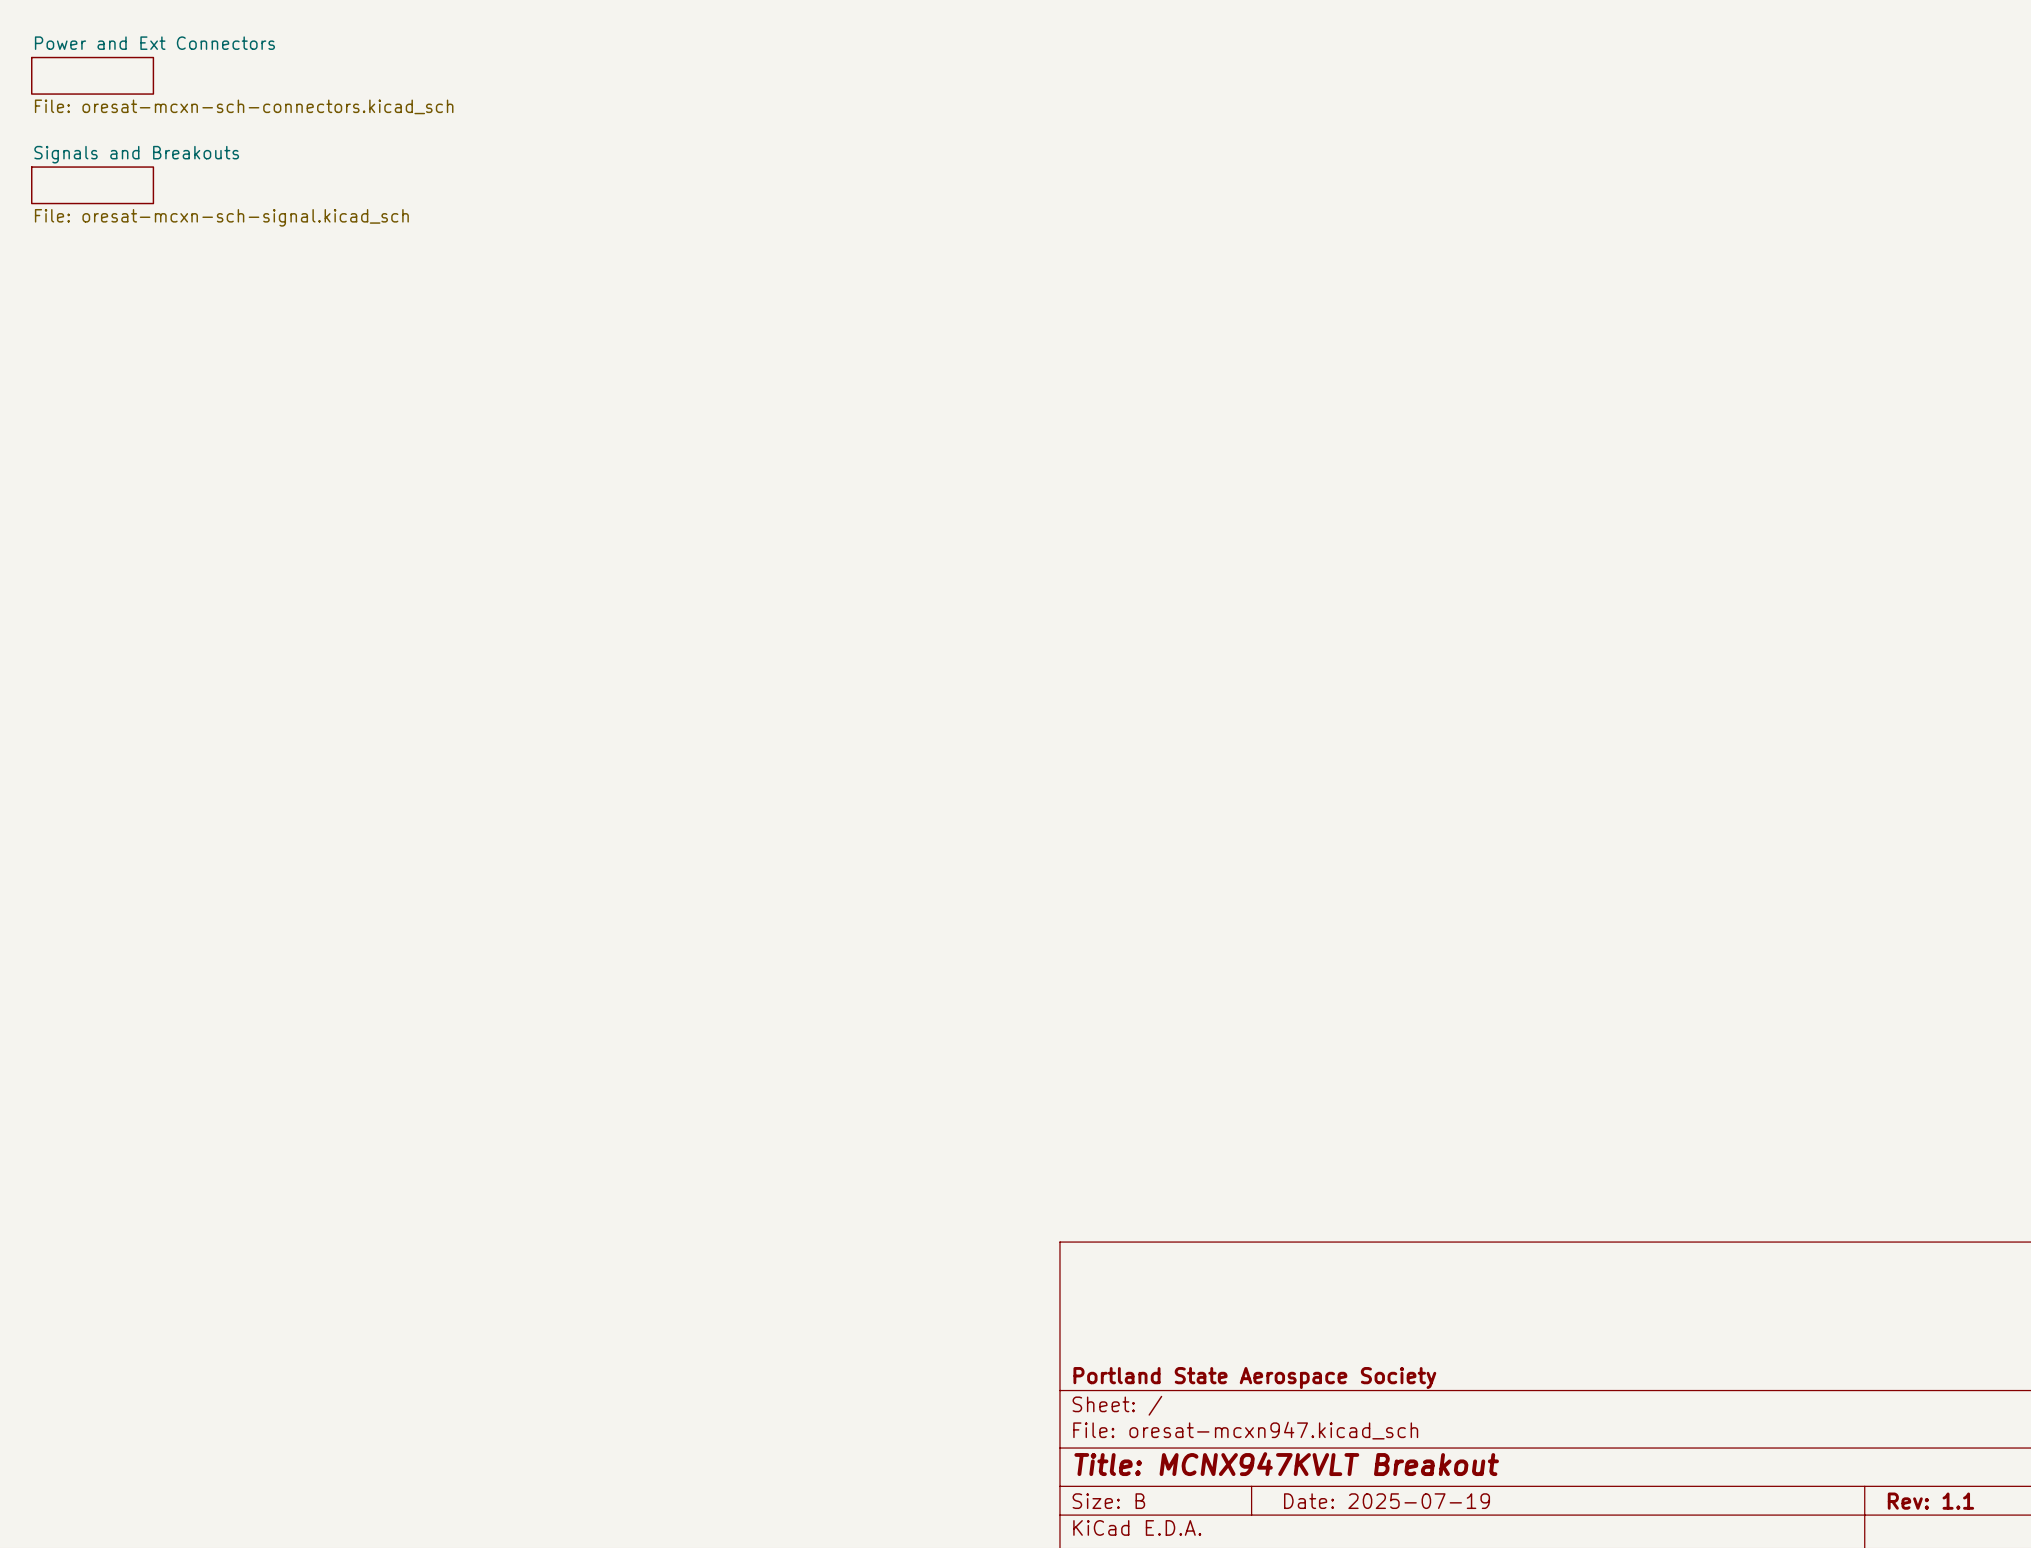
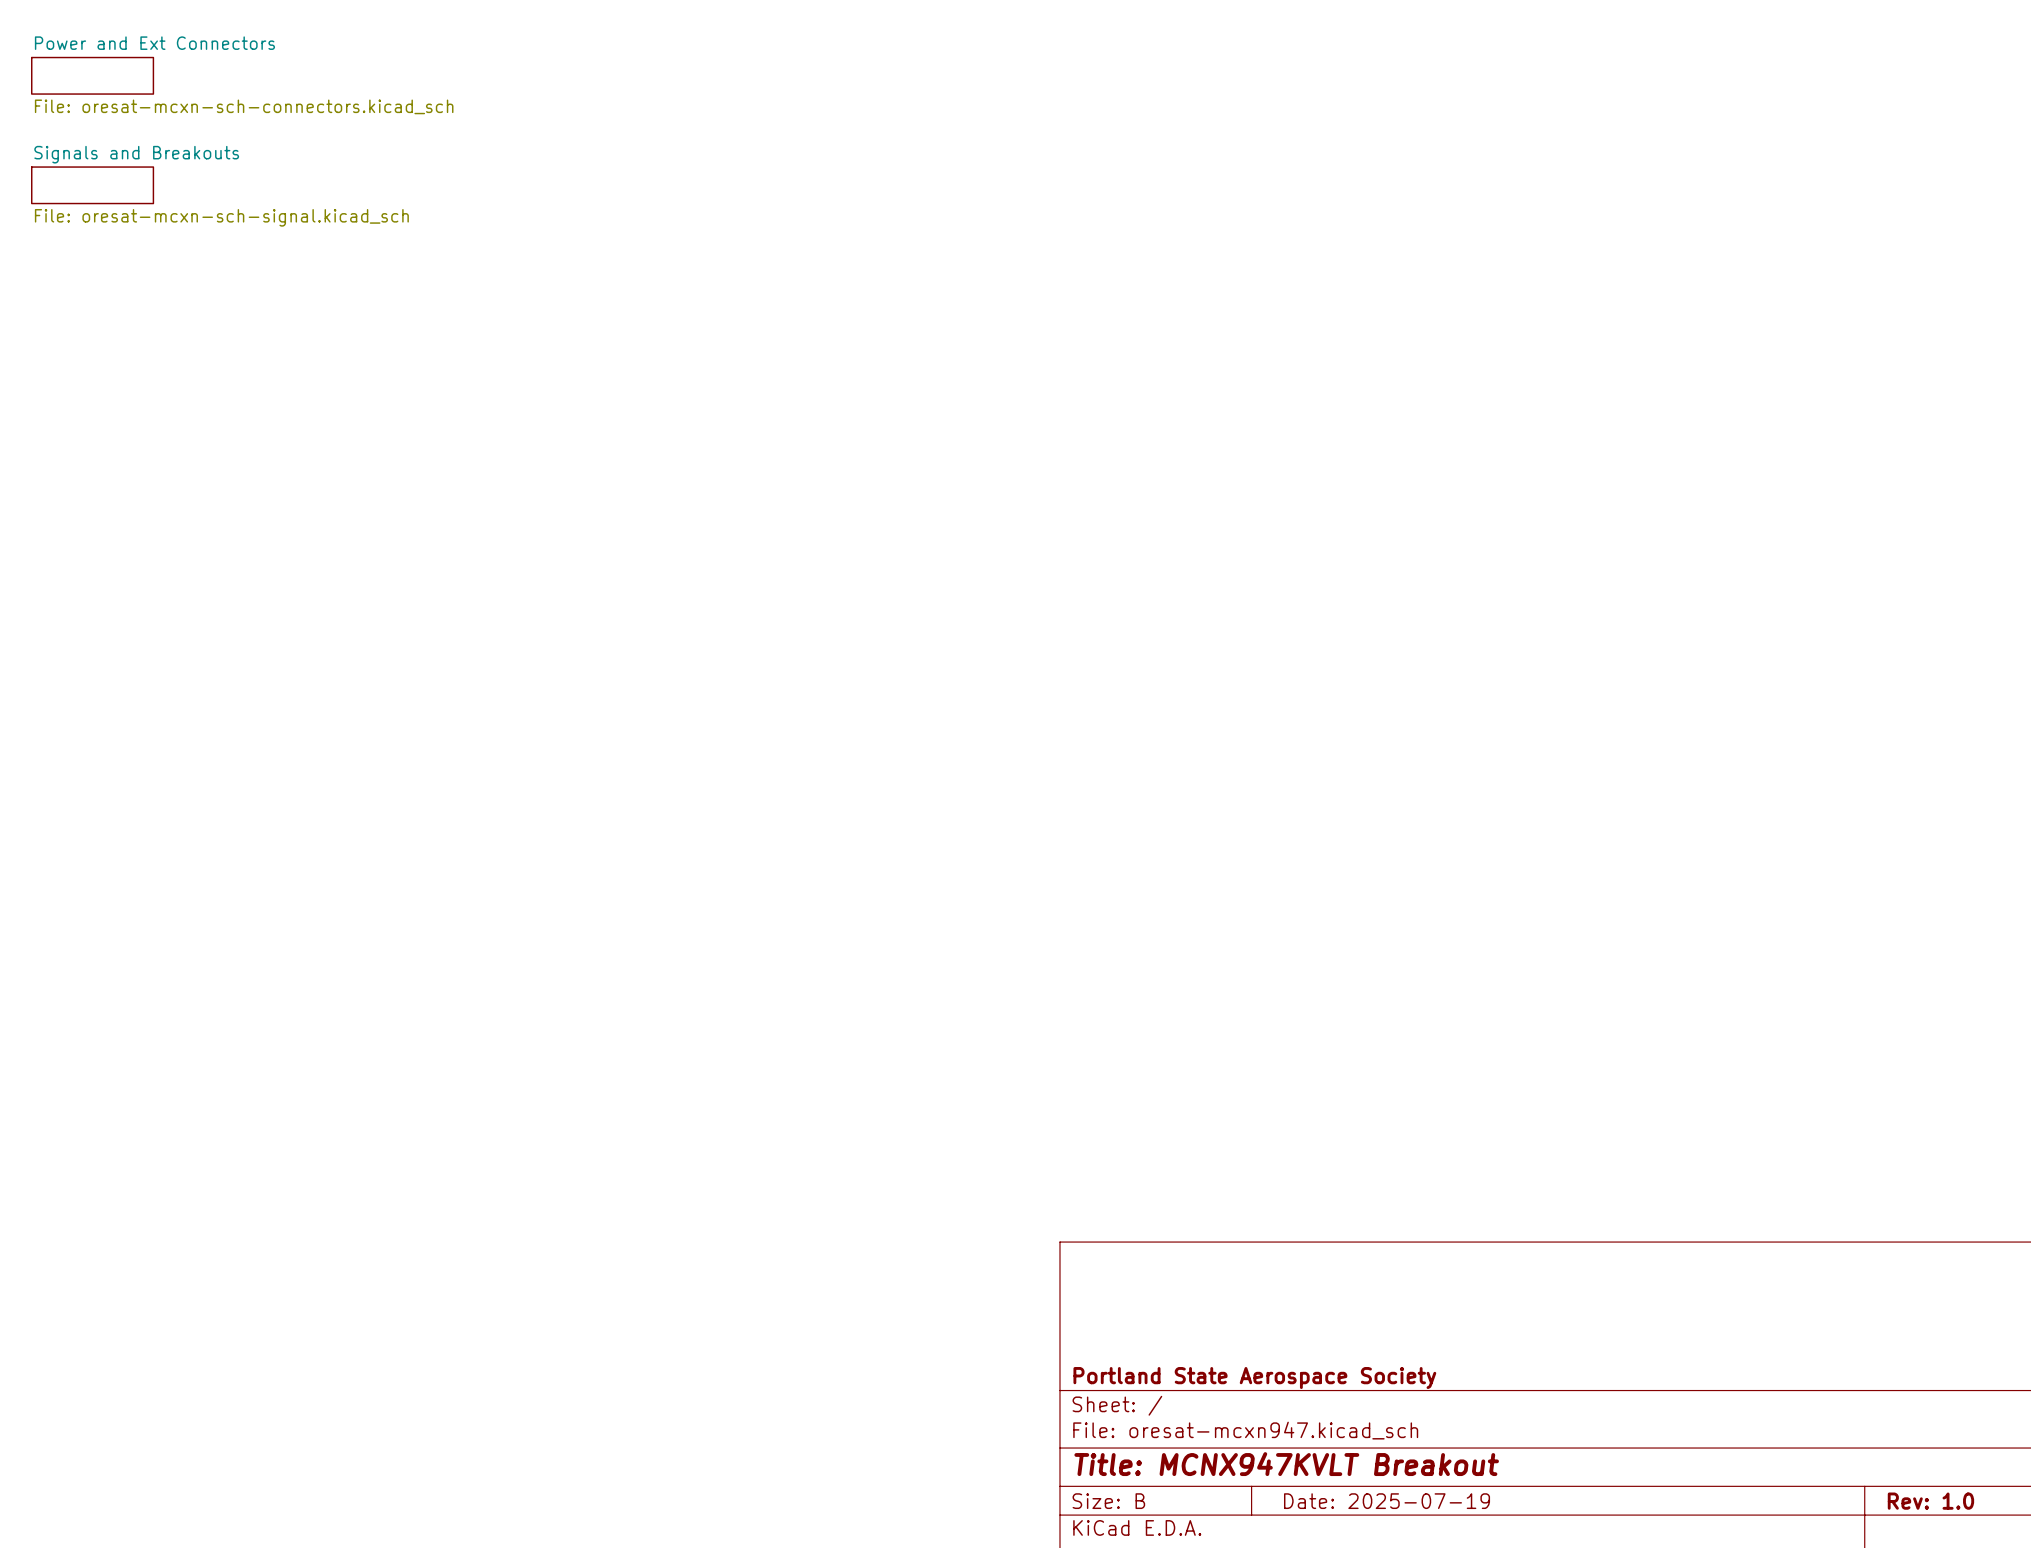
title block: Rev: 1.1 (1930, 1501) -> Rev: 1.0 (1930, 1501)

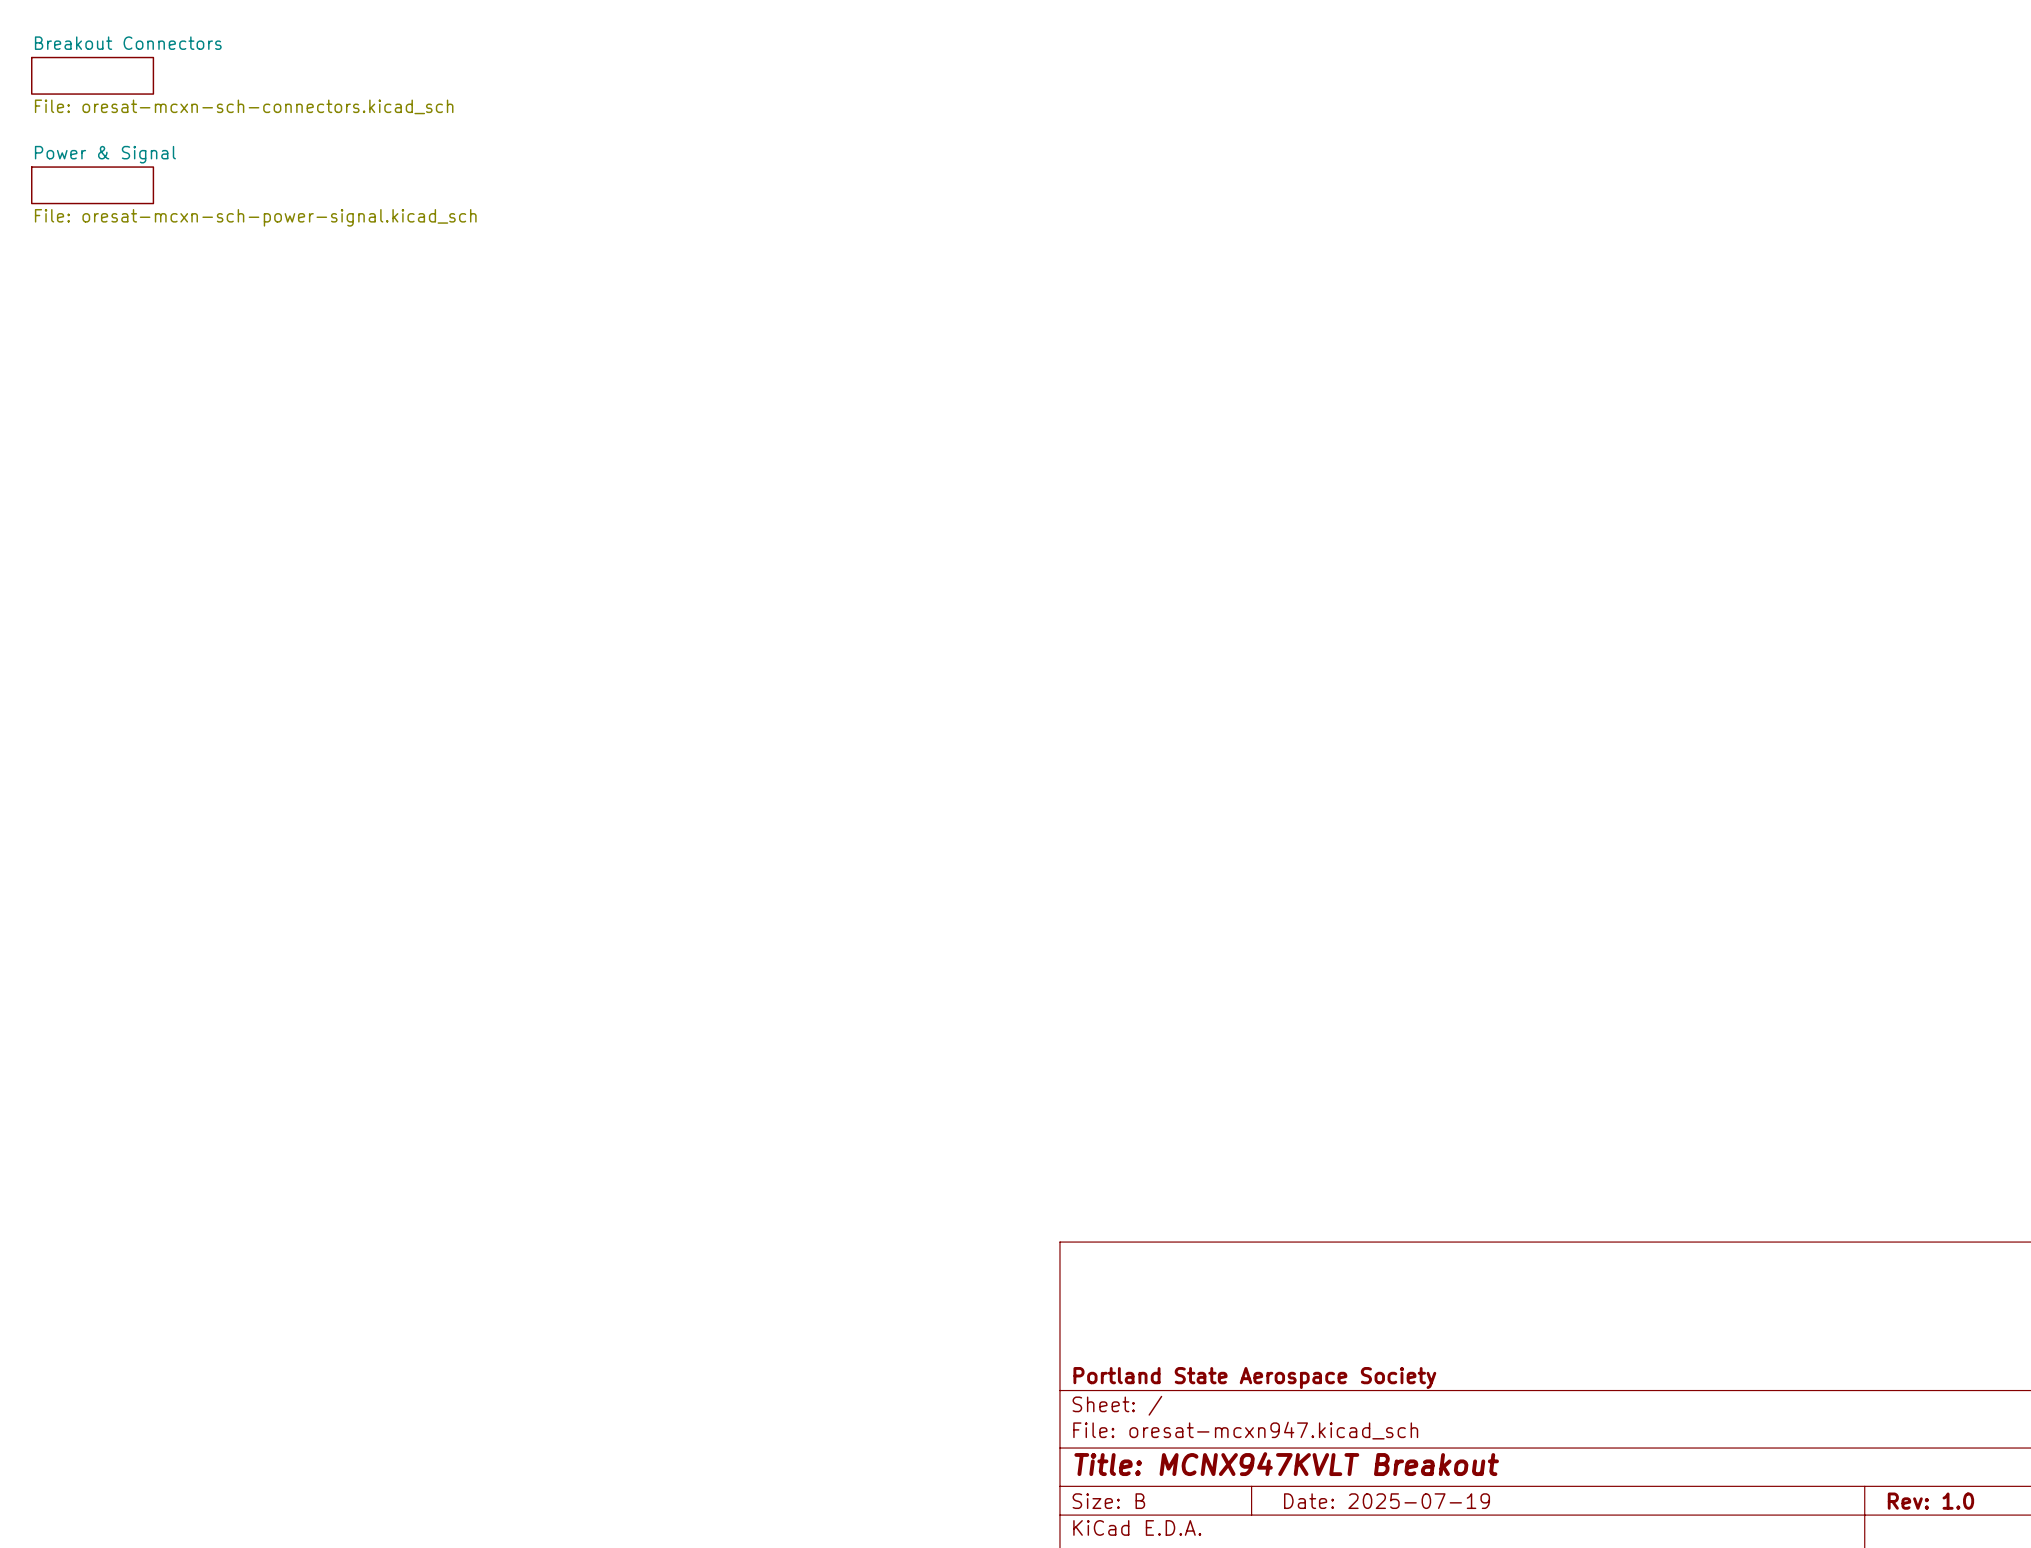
sheet Power and Ext Connectors name: Power and Ext Connectors (154, 43) -> Breakout Connectors (128, 43)
sheet Signals and Breakouts name: Signals and Breakouts (136, 154) -> Power & Signal (105, 154)
sheet Signals and Breakouts value: File: oresat-mcxn-sch-signal.kicad_sch (221, 217) -> File: oresat-mcxn-sch-power-signal.kicad_sch (255, 217)

